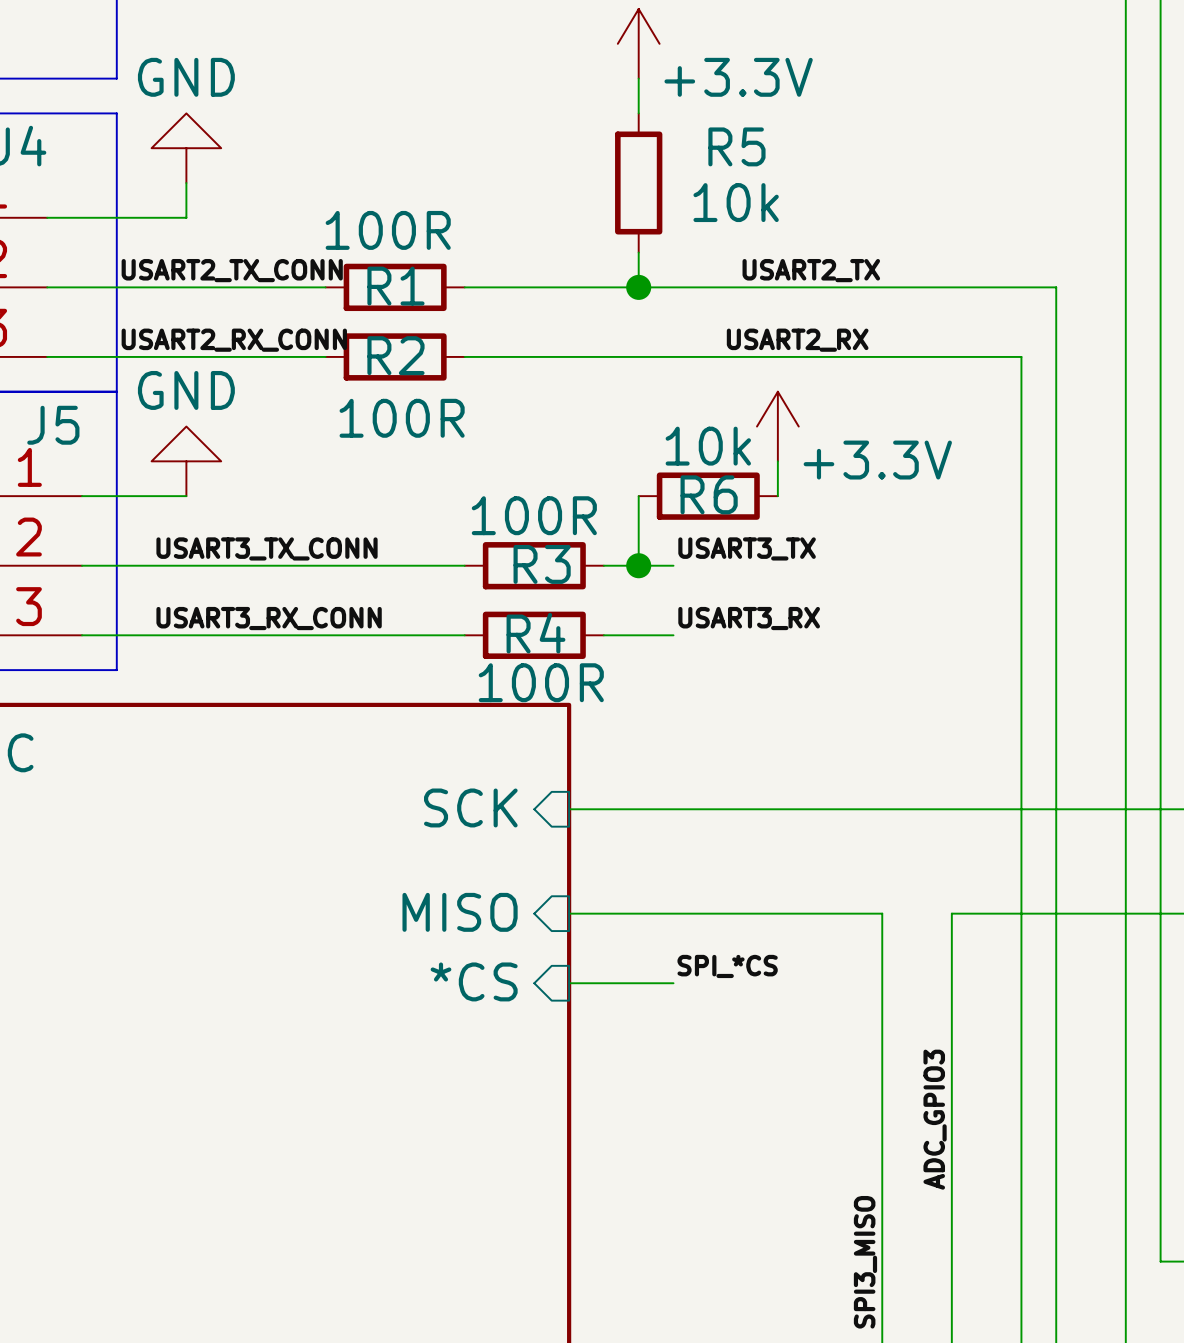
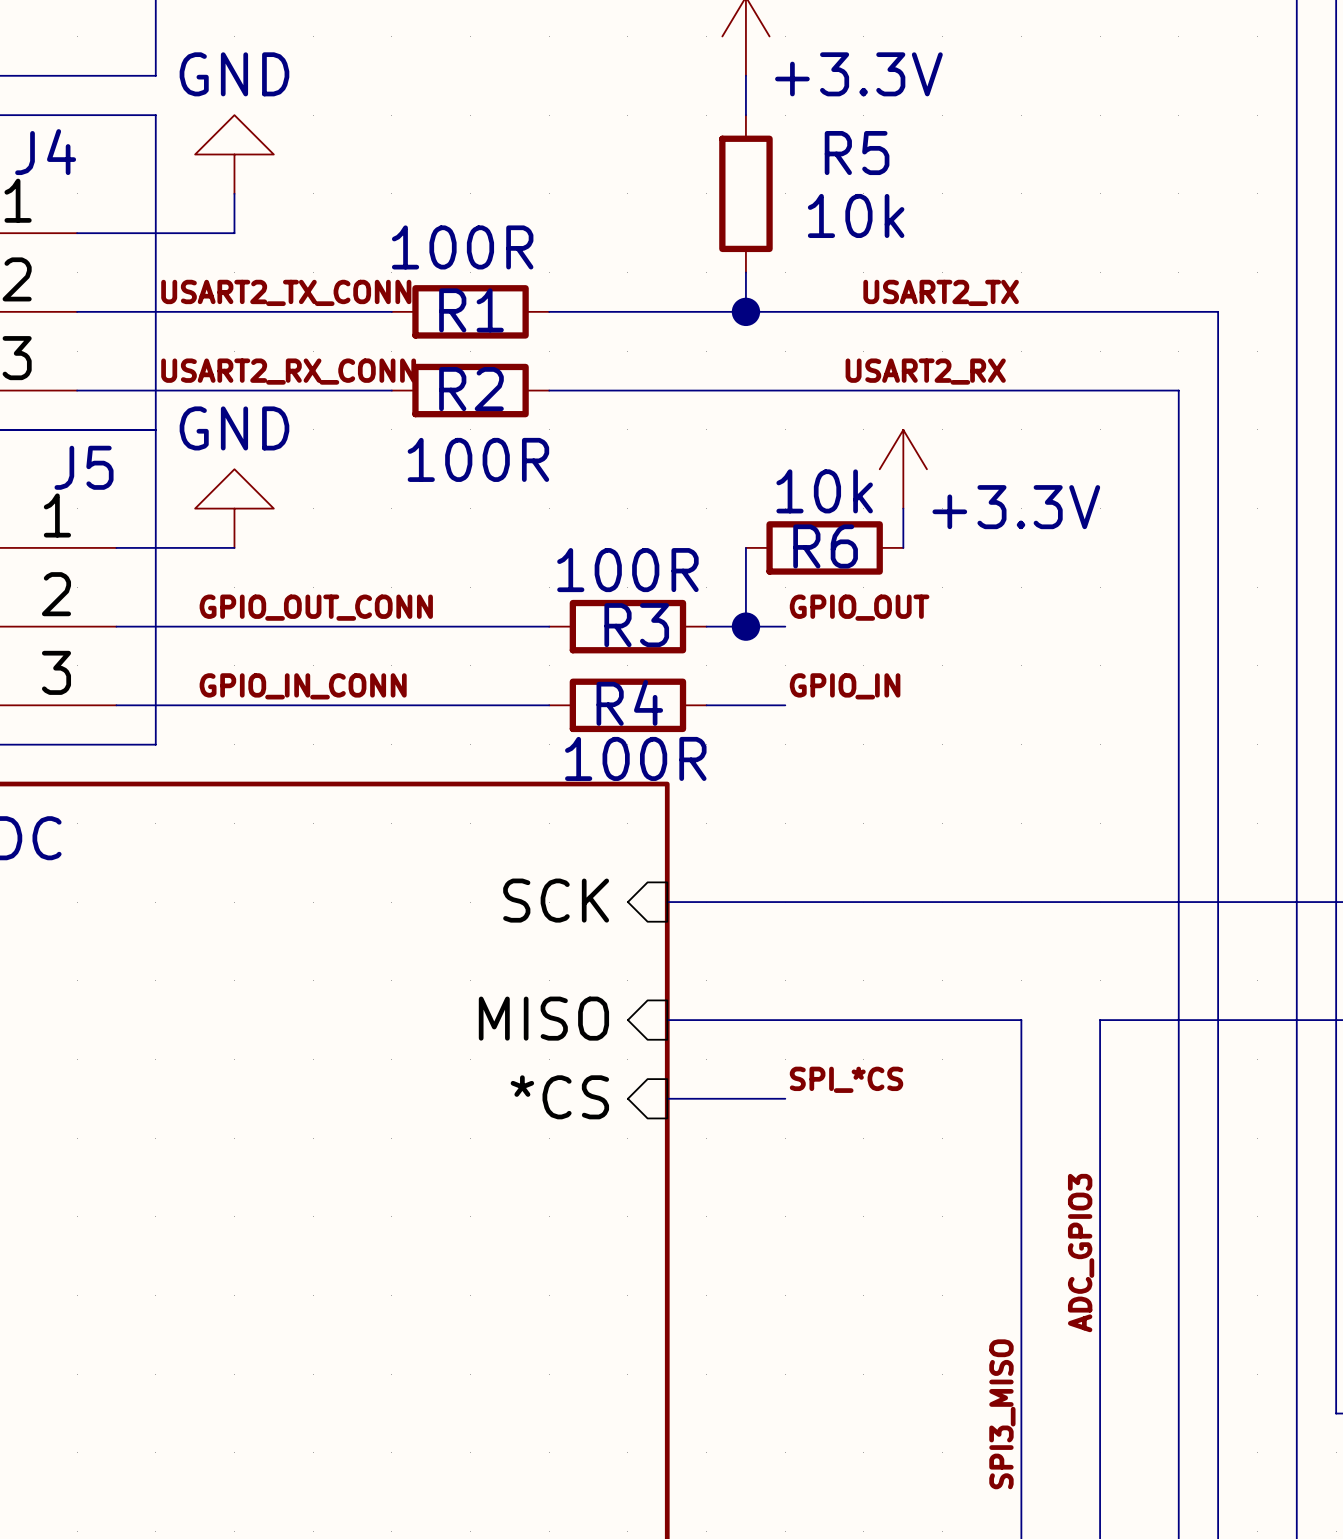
label: USART3_TX_CONN (267, 548) -> GPIO_OUT_CONN (316, 607)
label: USART3_TX (747, 548) -> GPIO_OUT (859, 607)
label: USART3_RX_CONN (269, 618) -> GPIO_IN_CONN (303, 686)
label: USART3_RX (749, 618) -> GPIO_IN (845, 686)

